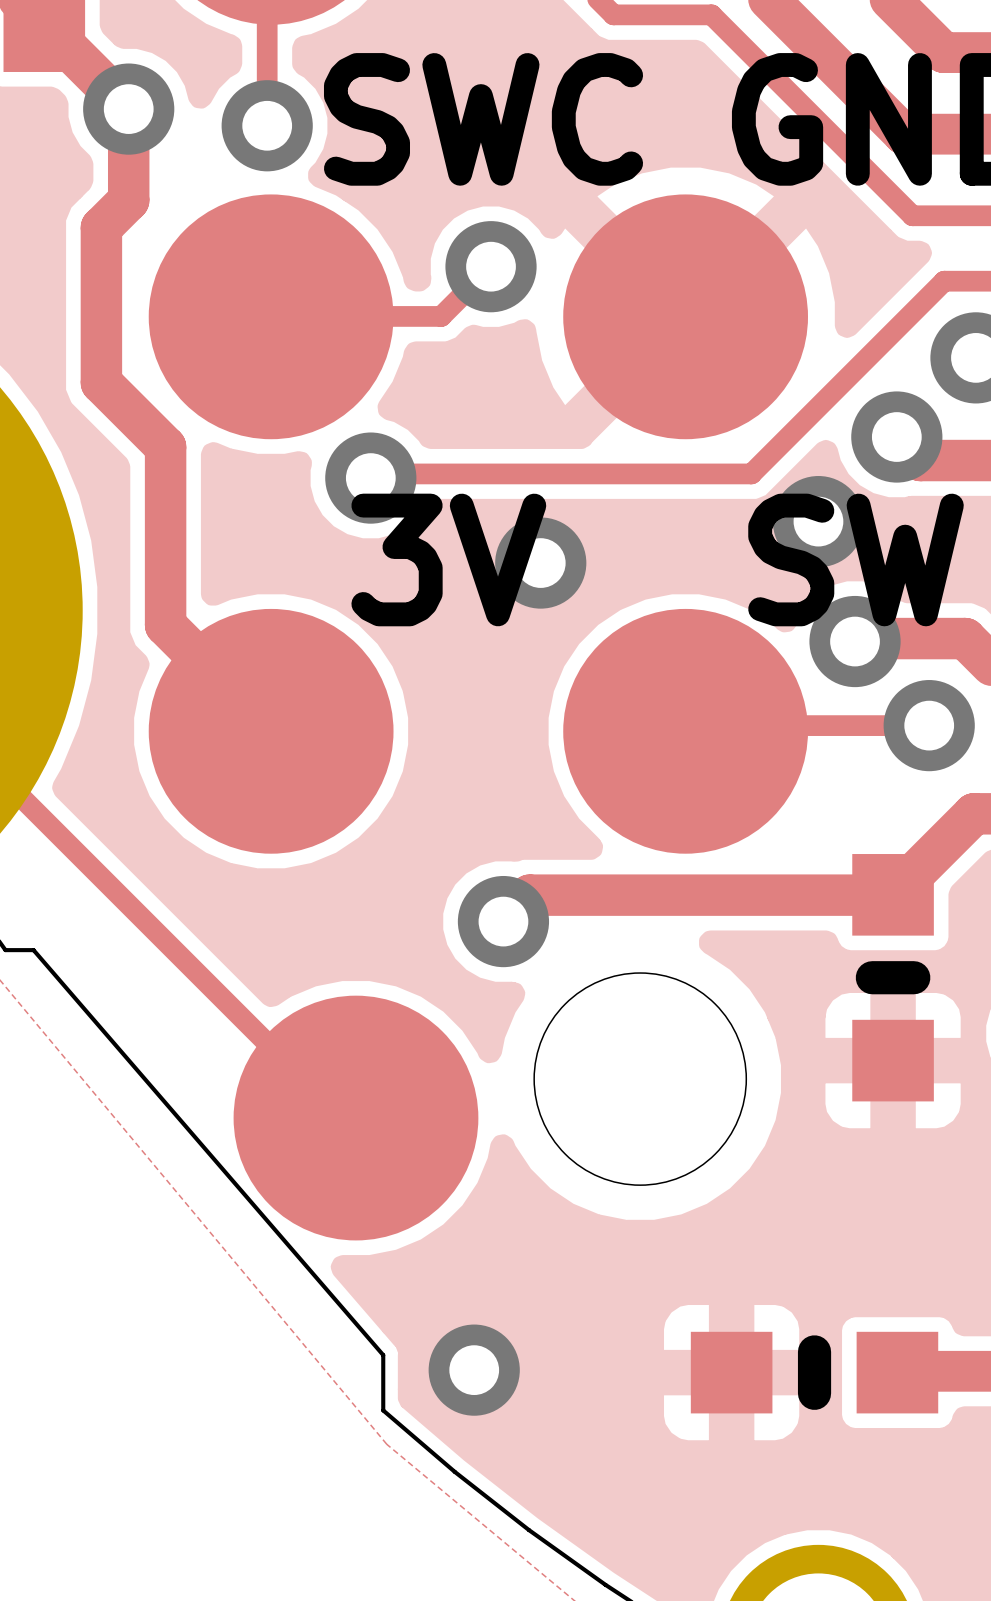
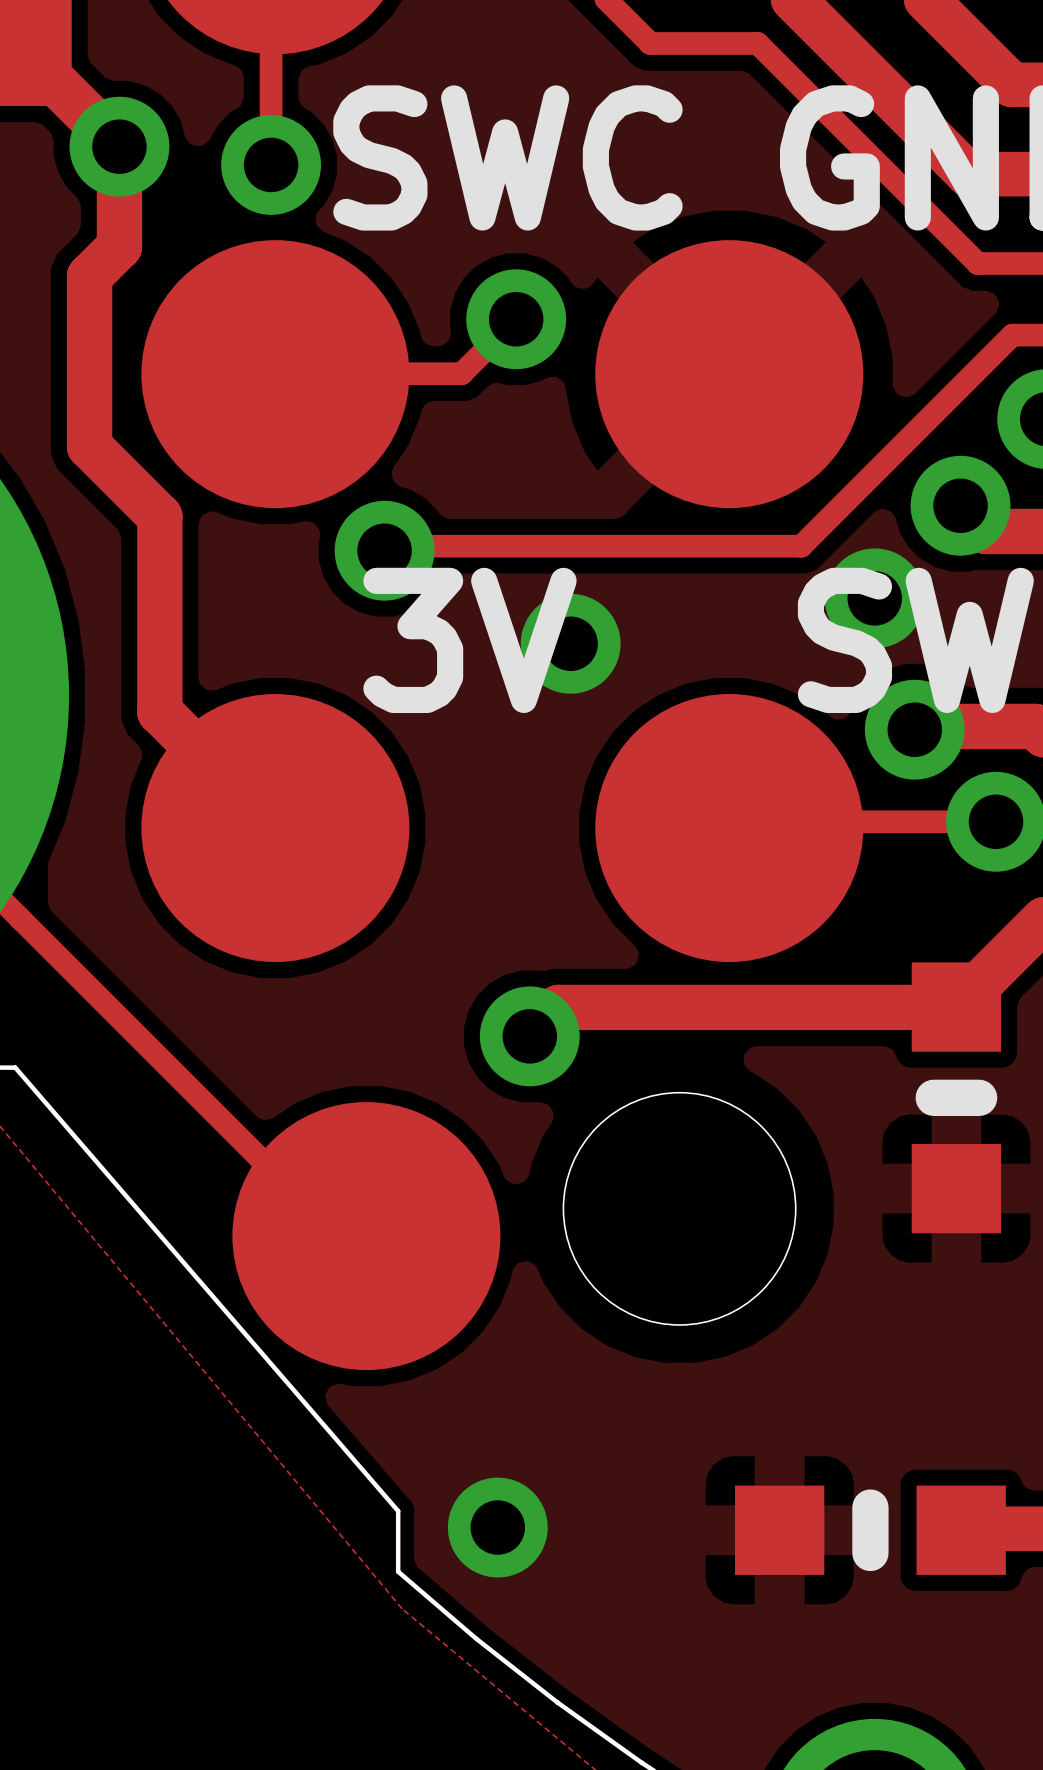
part position: (355, 1118) -> (366, 1236)

